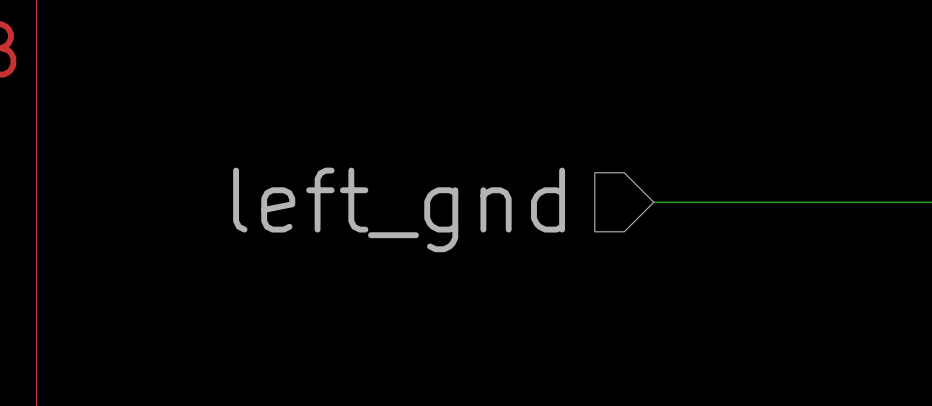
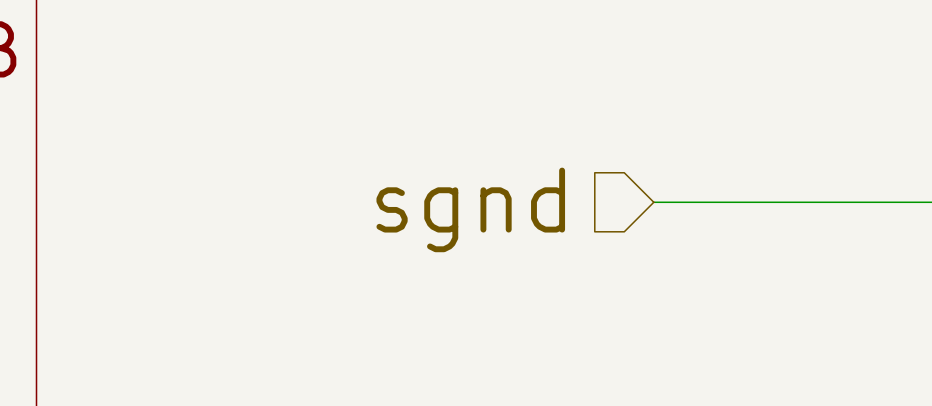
hierarchical label: left_gnd (399, 209) -> sgnd (470, 209)

